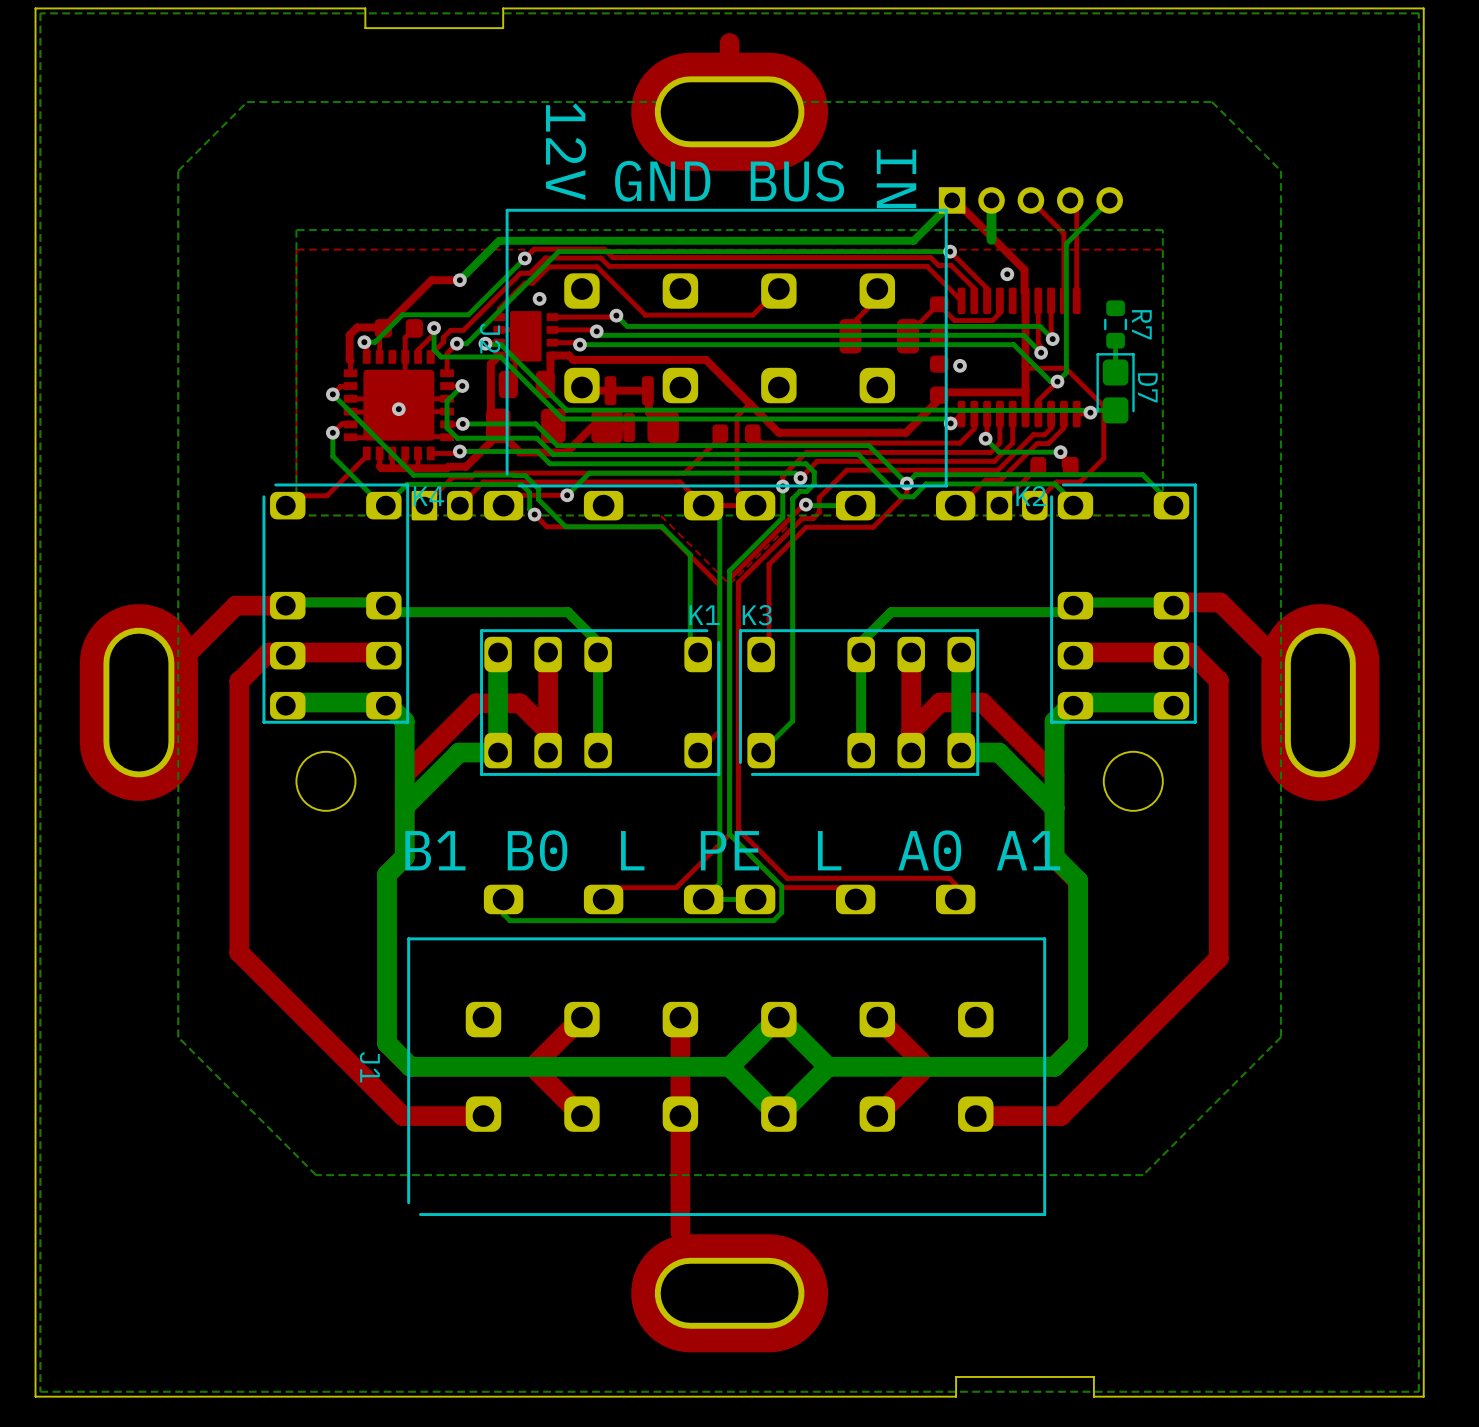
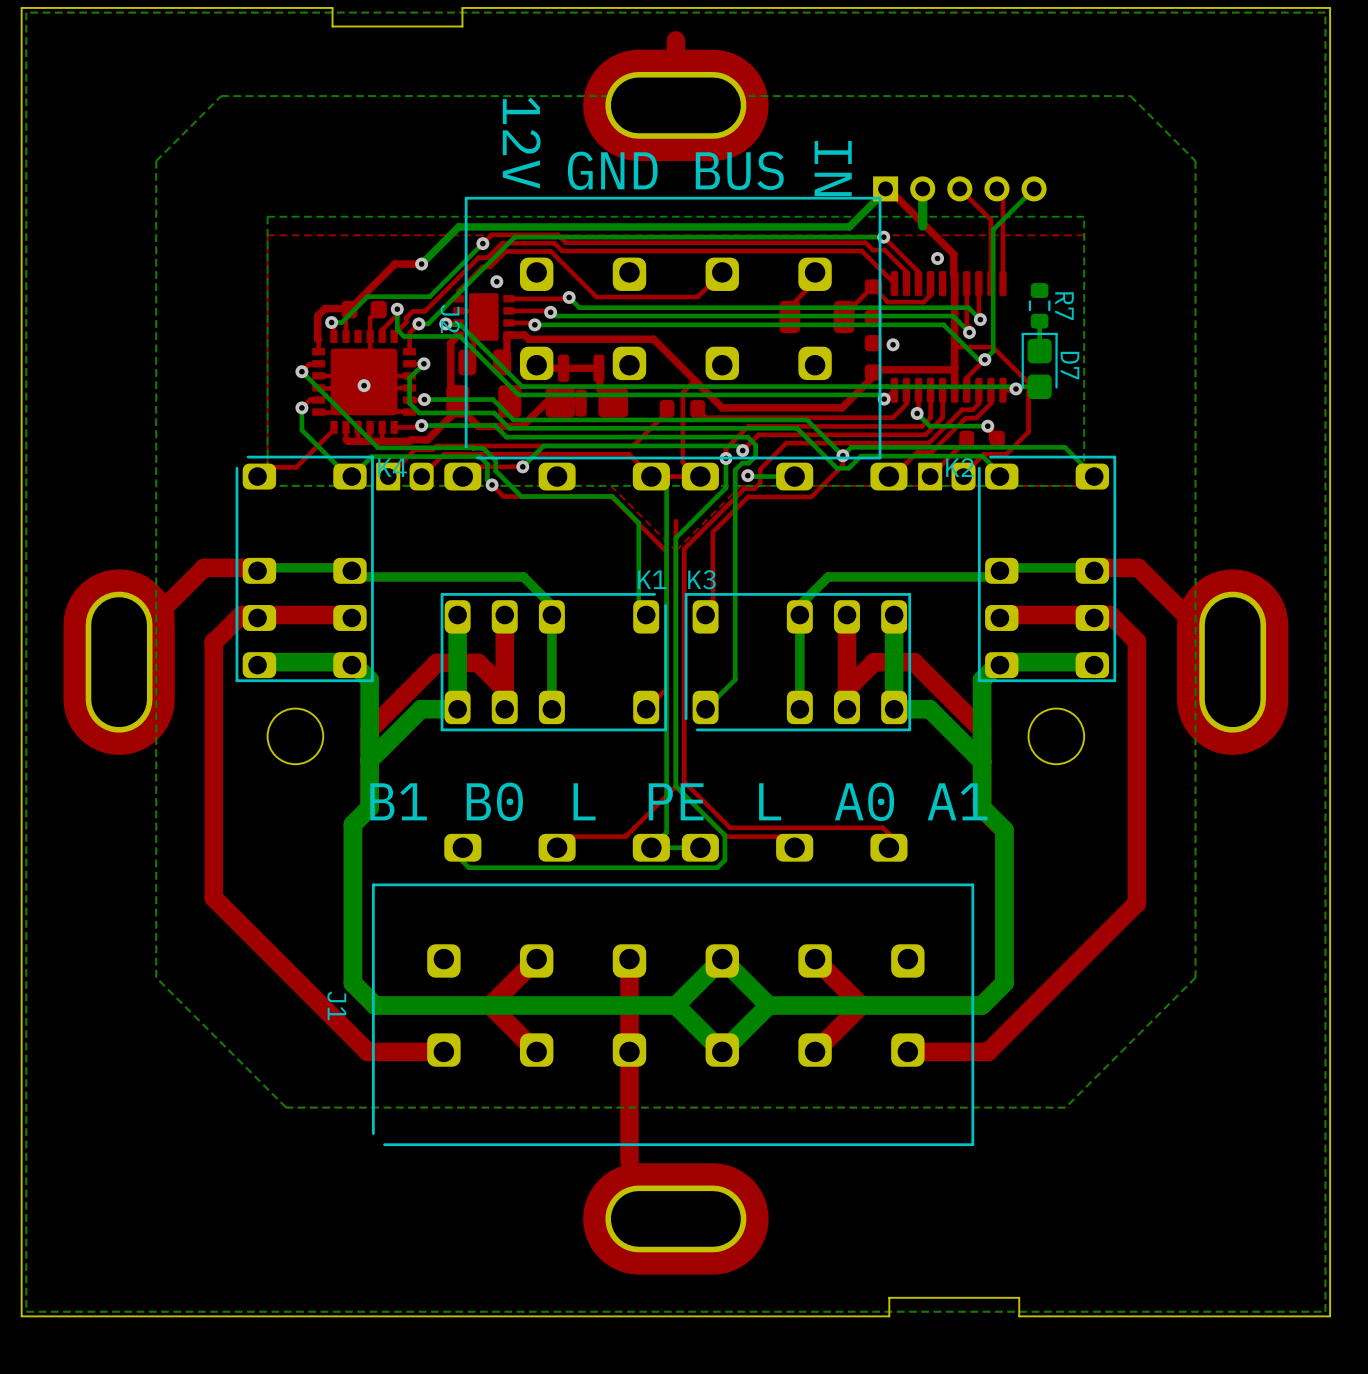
top track: (805, 504) (803, 504) (729, 578) -> (675, 521) (675, 545)
top track: (289, 602) (285, 605) (235, 605) (188, 653) -> (260, 567) (204, 567) (119, 652) (119, 662)

